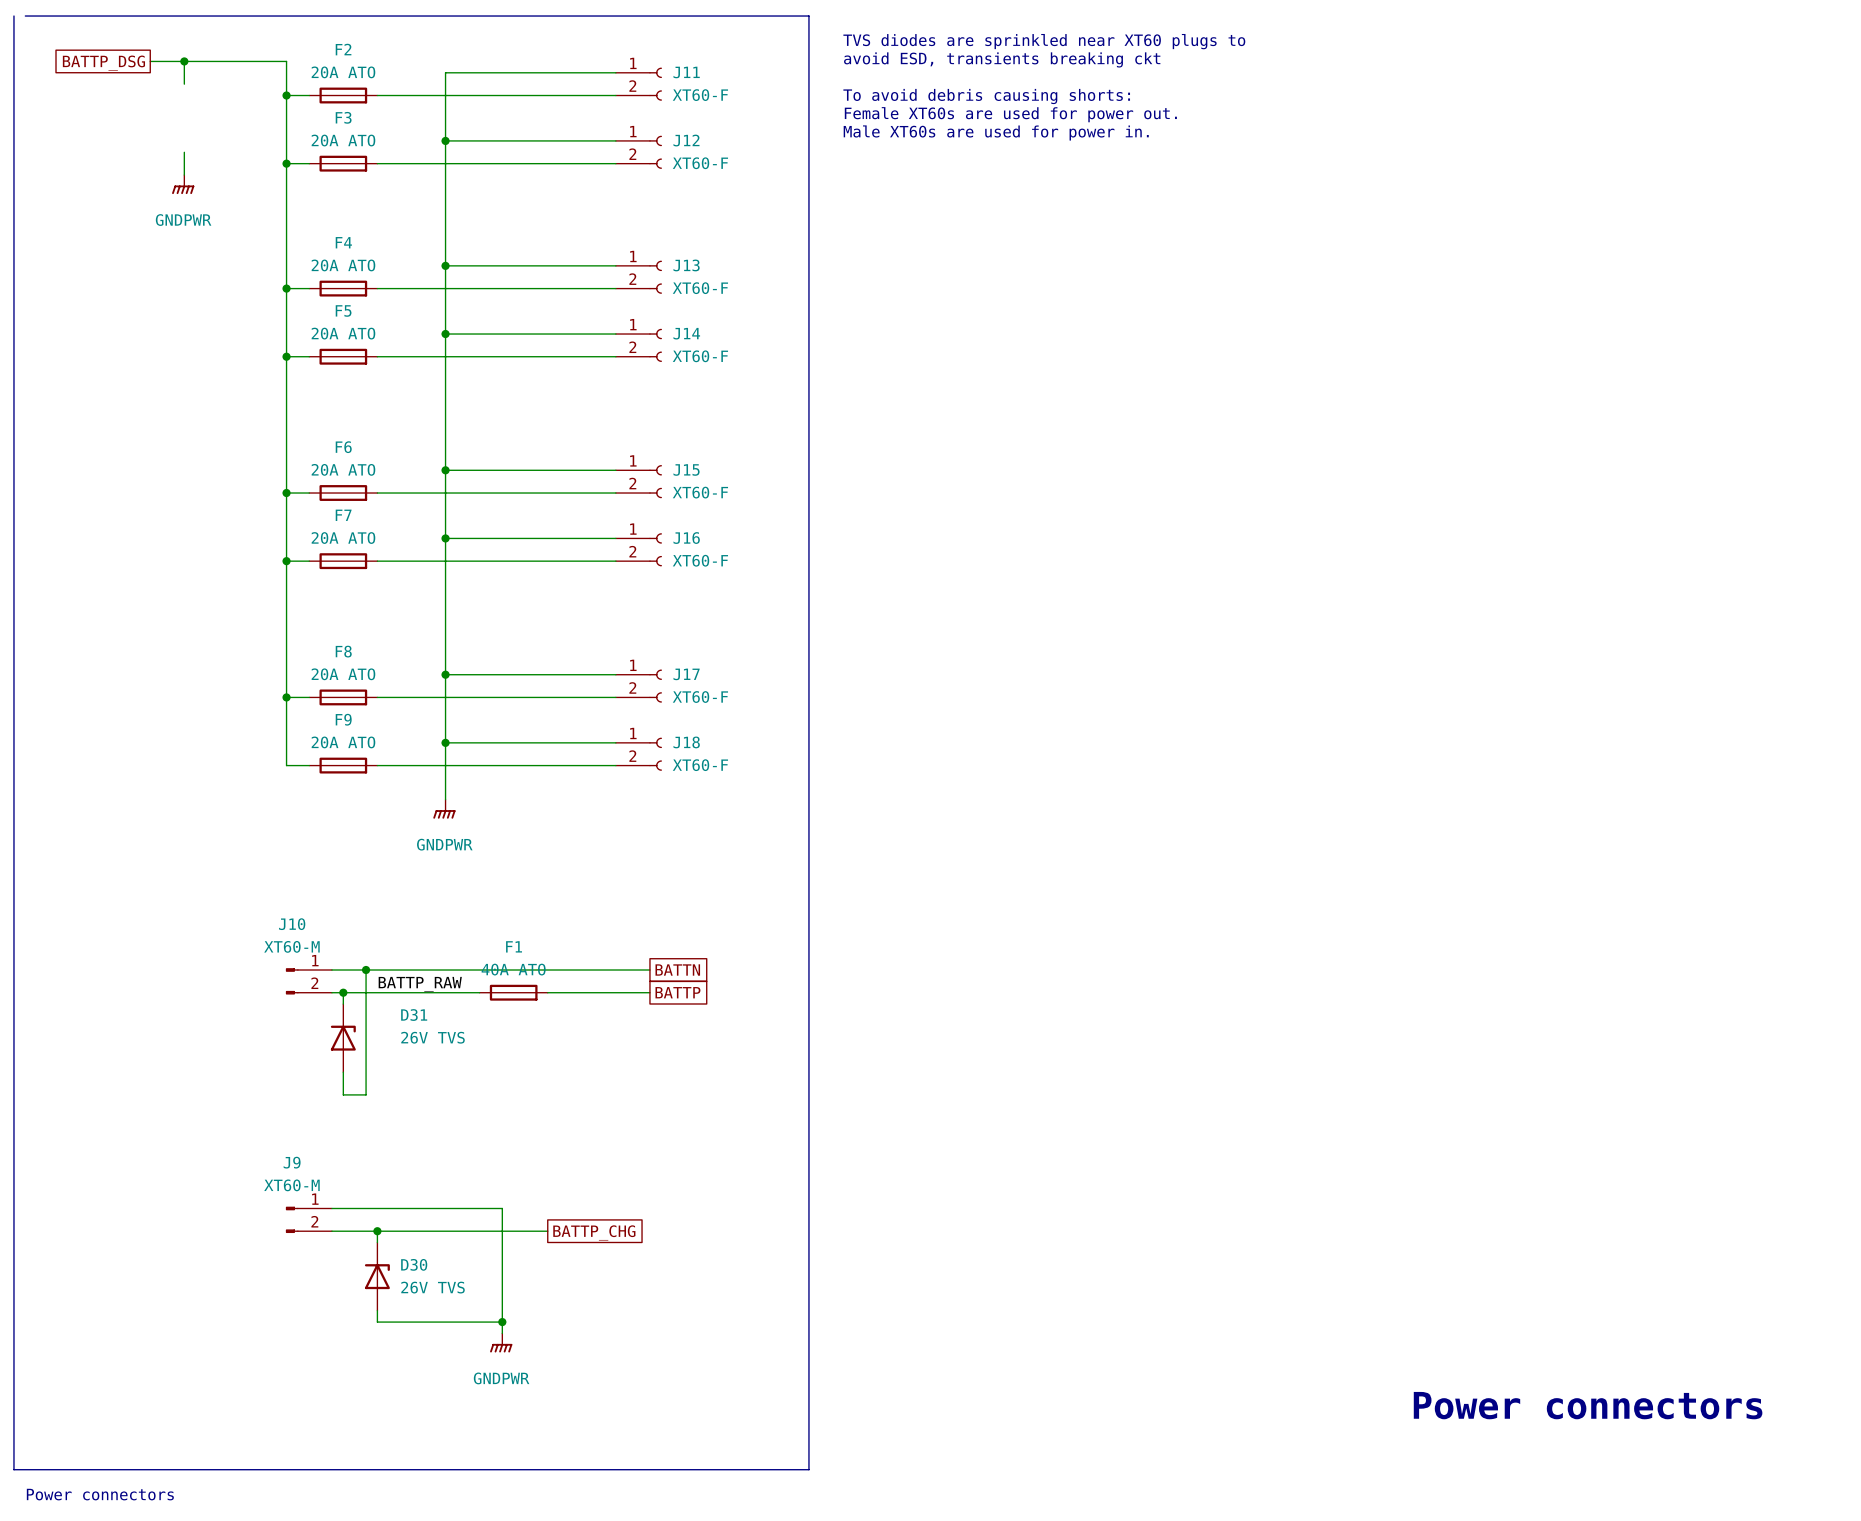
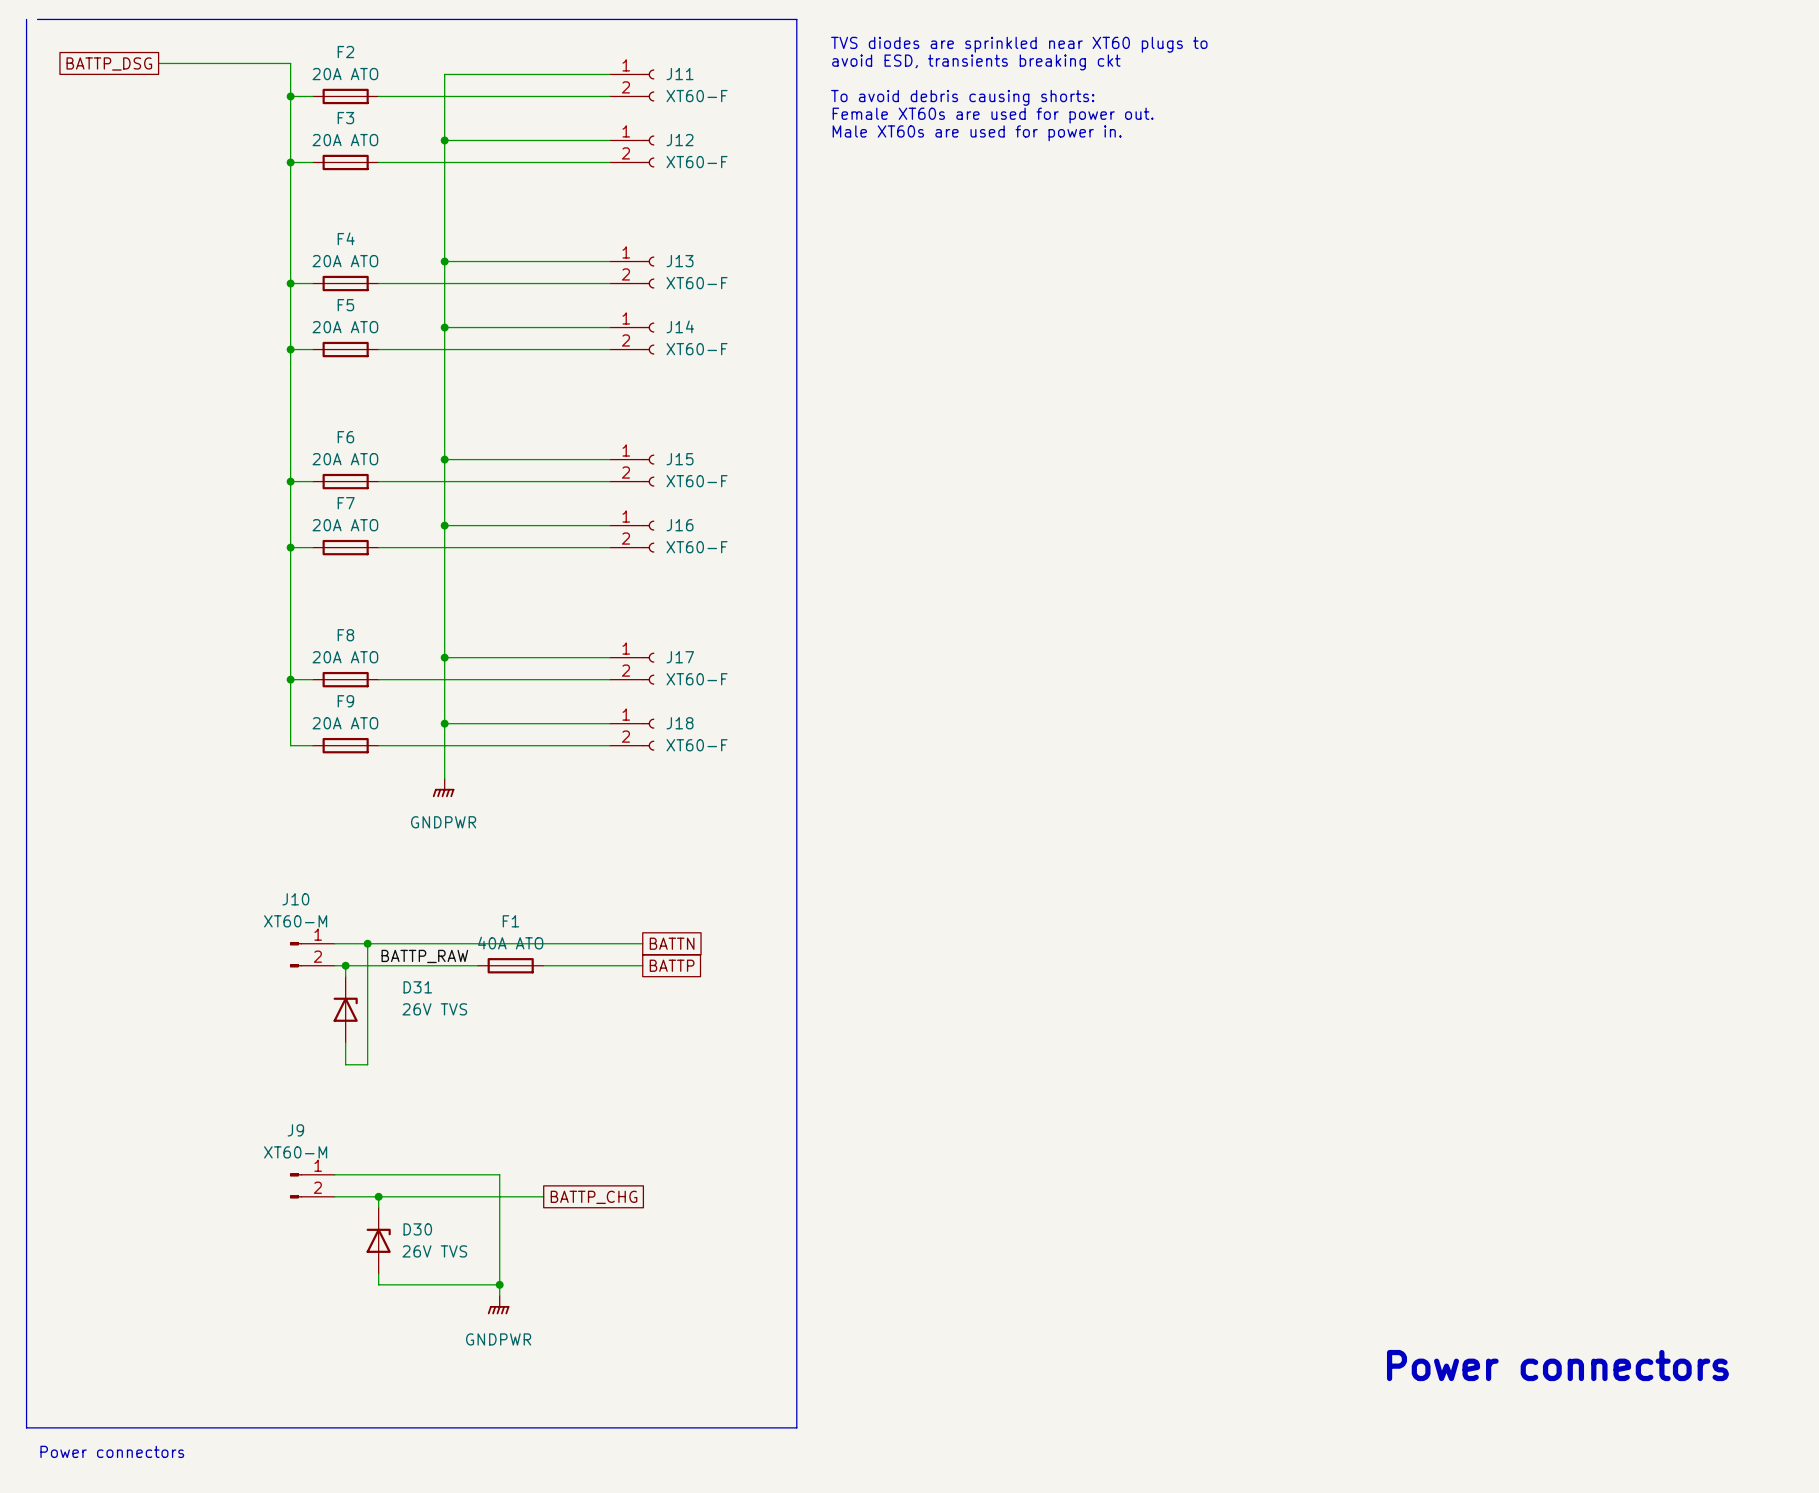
wire: (184, 61) (184, 84) -> none
junction: (184, 61) -> none
wire: (184, 152) (184, 175) -> none
power symbol: GNDPWR (183, 184) -> none

